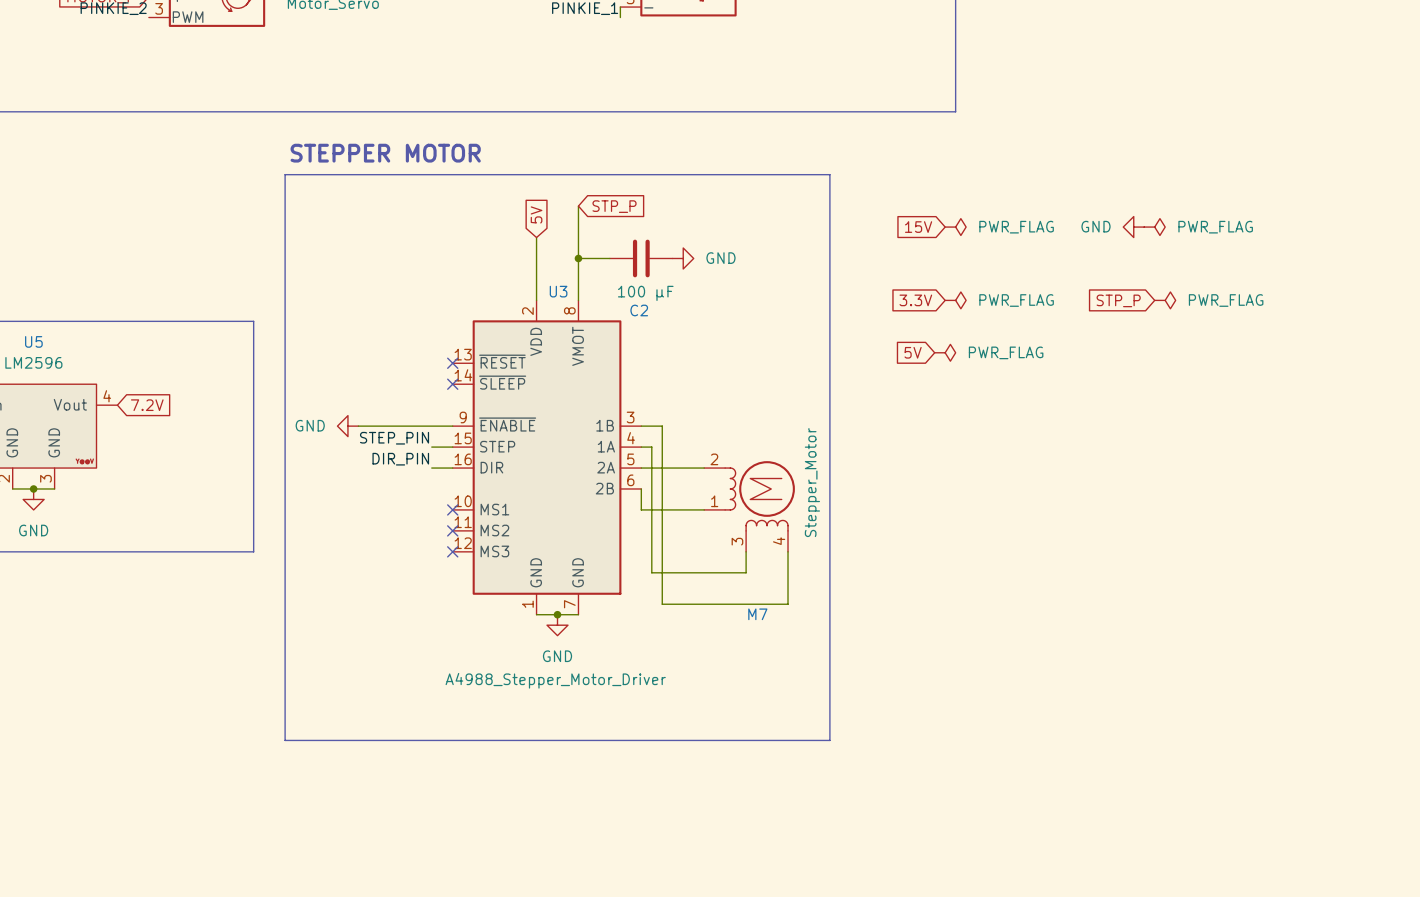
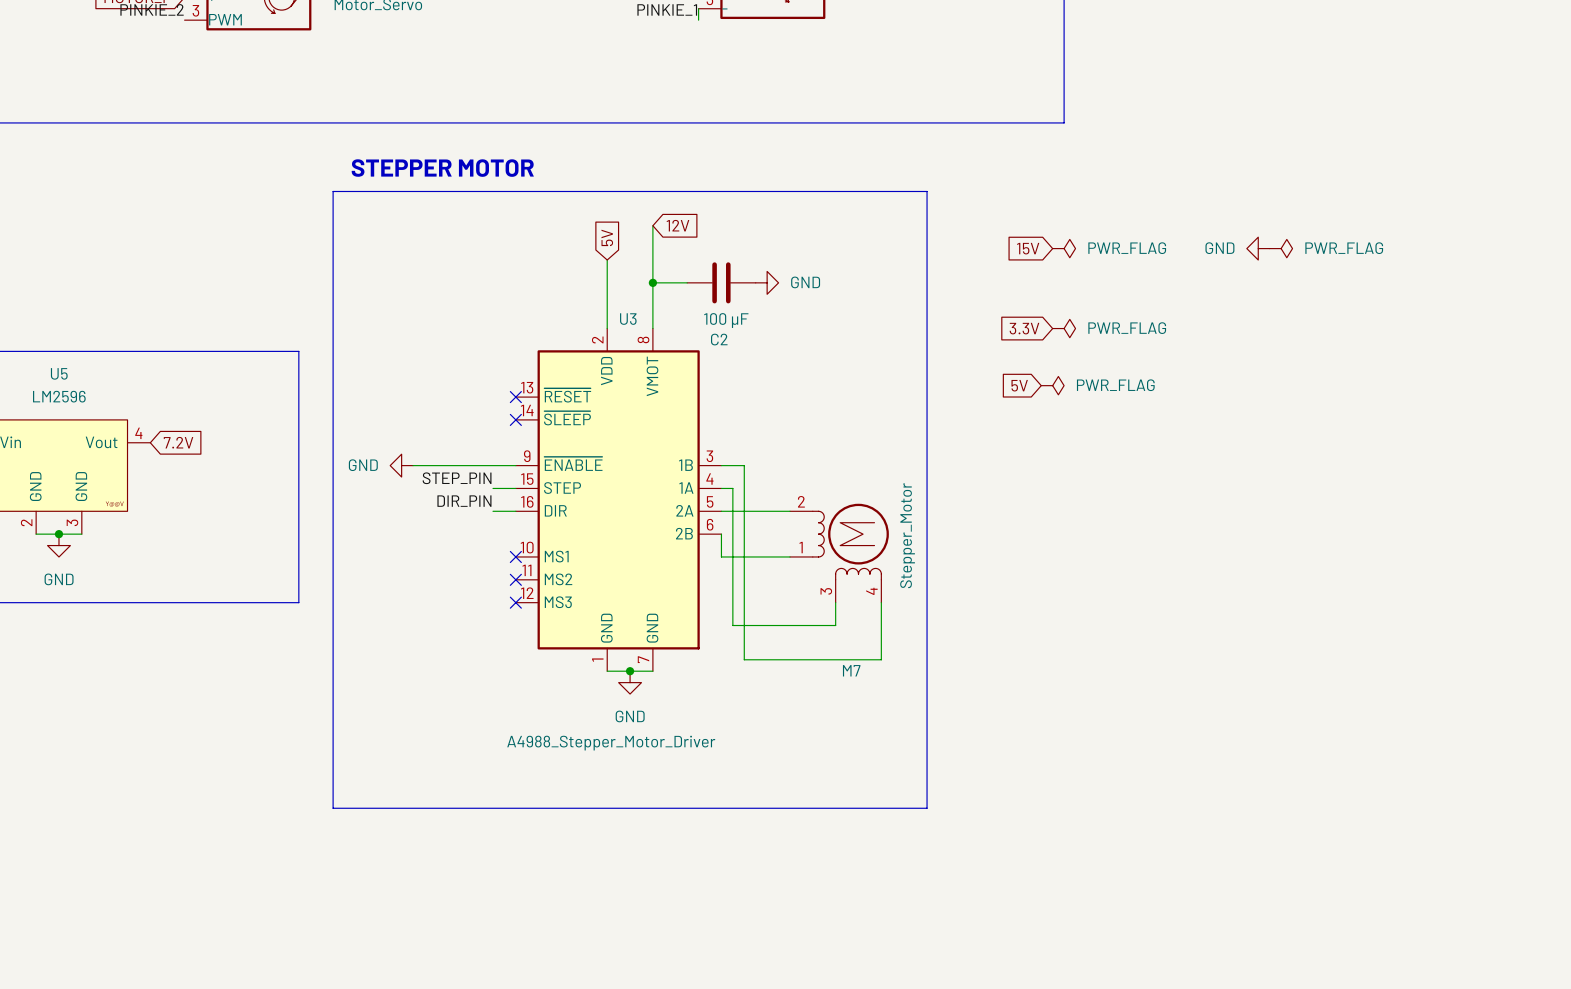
global label: STP_P (614, 206) -> 12V (678, 225)
global label: STP_P (1118, 300) -> none
power symbol: PWR_FLAG (1165, 300) -> none

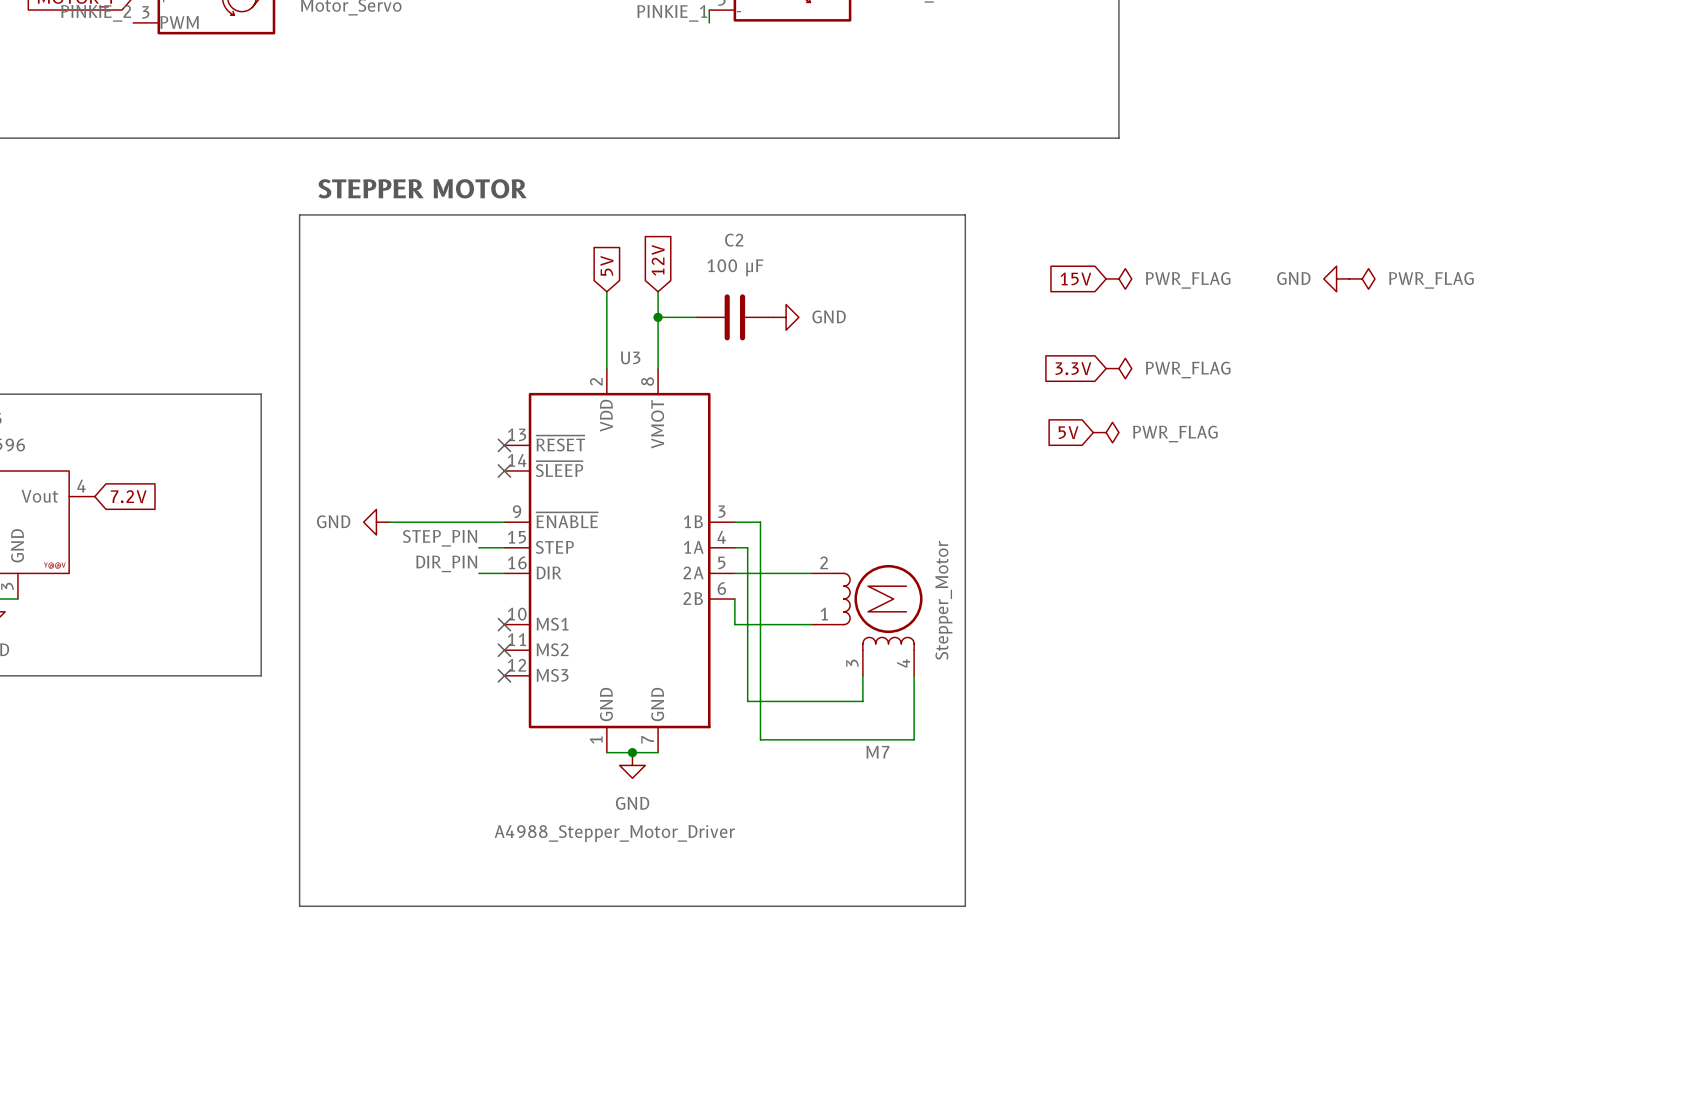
wire: (652, 225) (652, 260) -> none
global label rotation: 0° (678, 225) -> 90° counterclockwise (658, 260)
C2 value position: 100 μF (726, 320) -> 100 μF (735, 267)
C2 name position: C2 (719, 339) -> C2 (734, 240)

